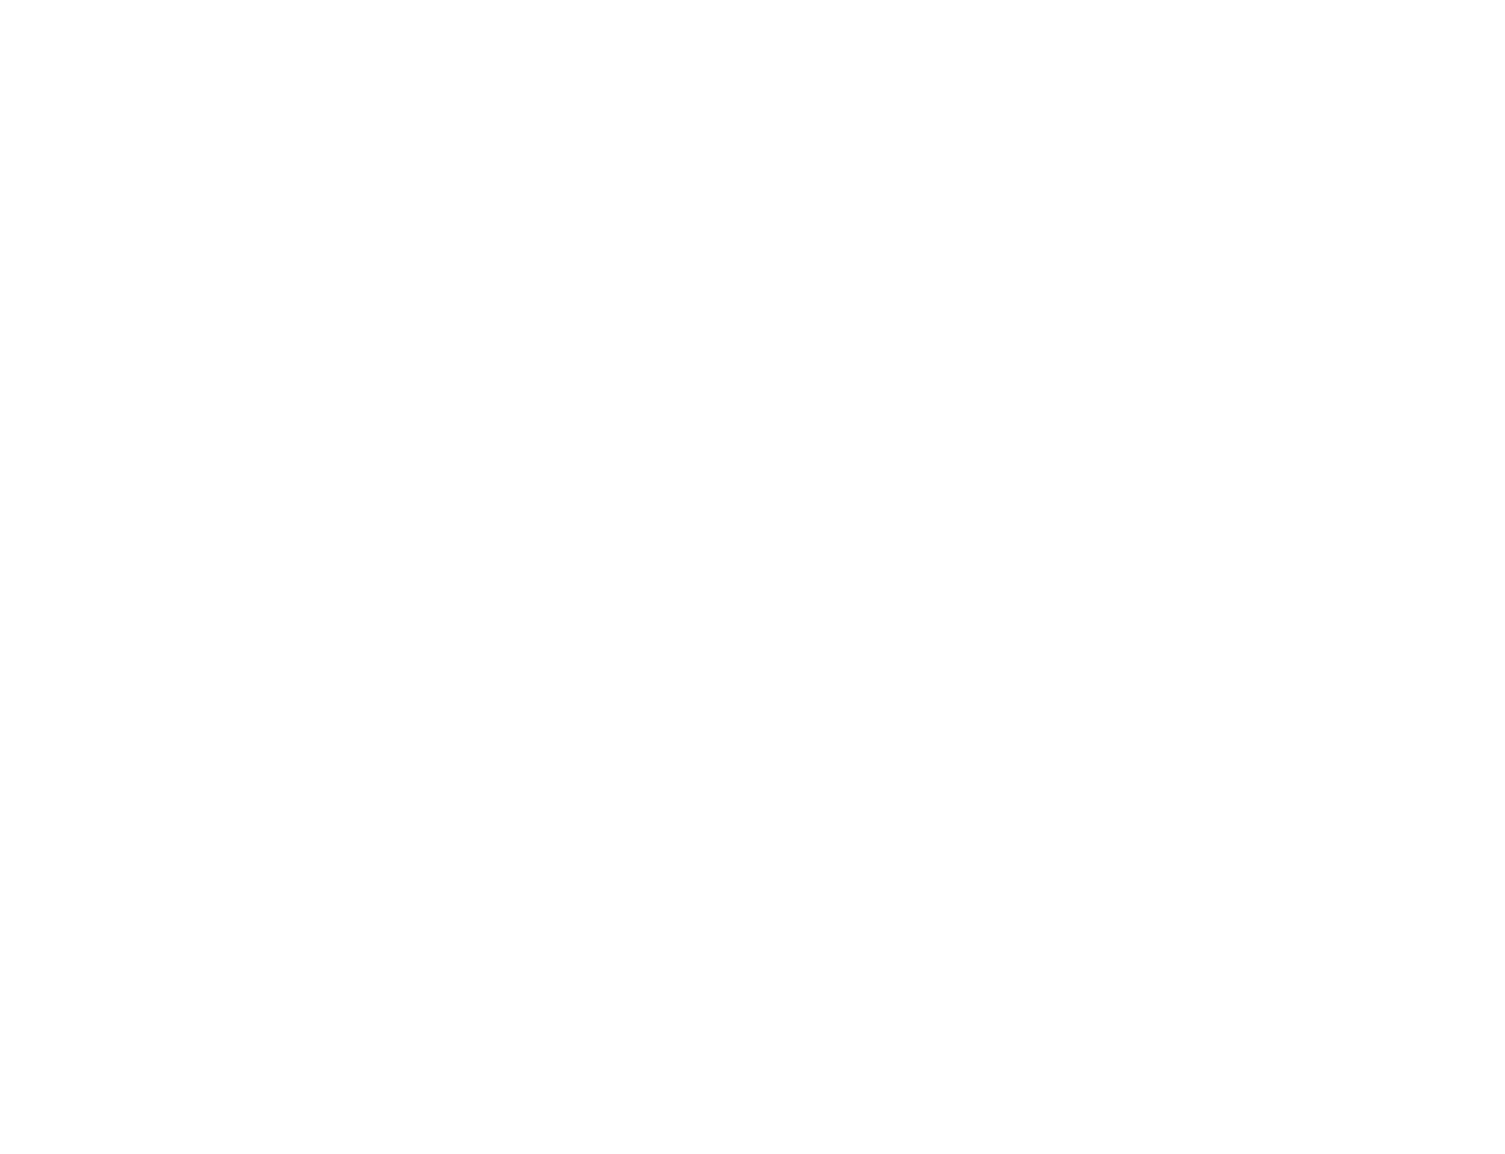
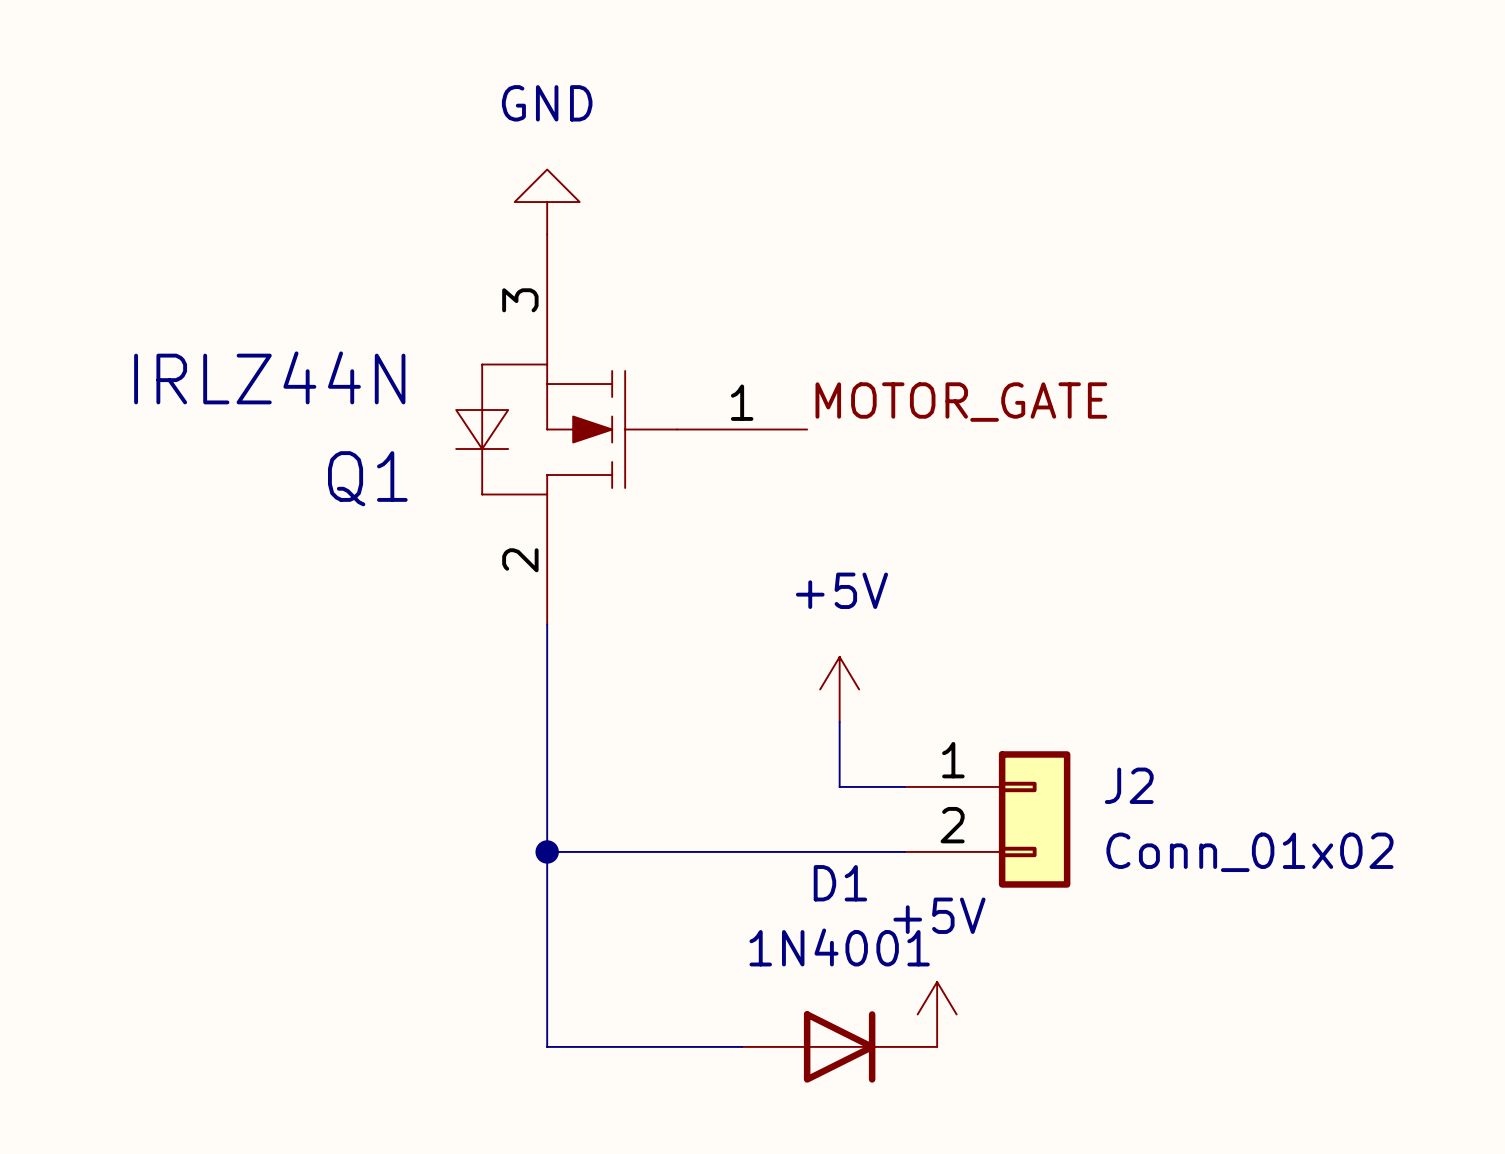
power symbol: none -> GND (547, 202)
label: none -> MOTOR_GATE (961, 402)
Q1: none -> IRLZ44N (631, 429)
wire: none -> (547, 624) (547, 1046) (742, 1046)
power symbol: none -> +5V (839, 689)
wire: none -> (839, 721) (839, 786) (904, 786)
J2: none -> Conn_01x02 (987, 819)
wire: none -> (547, 851) (904, 851)
junction: none -> (547, 851)
power symbol: none -> +5V (937, 1014)
D1: none -> 1N4001 (839, 1046)

